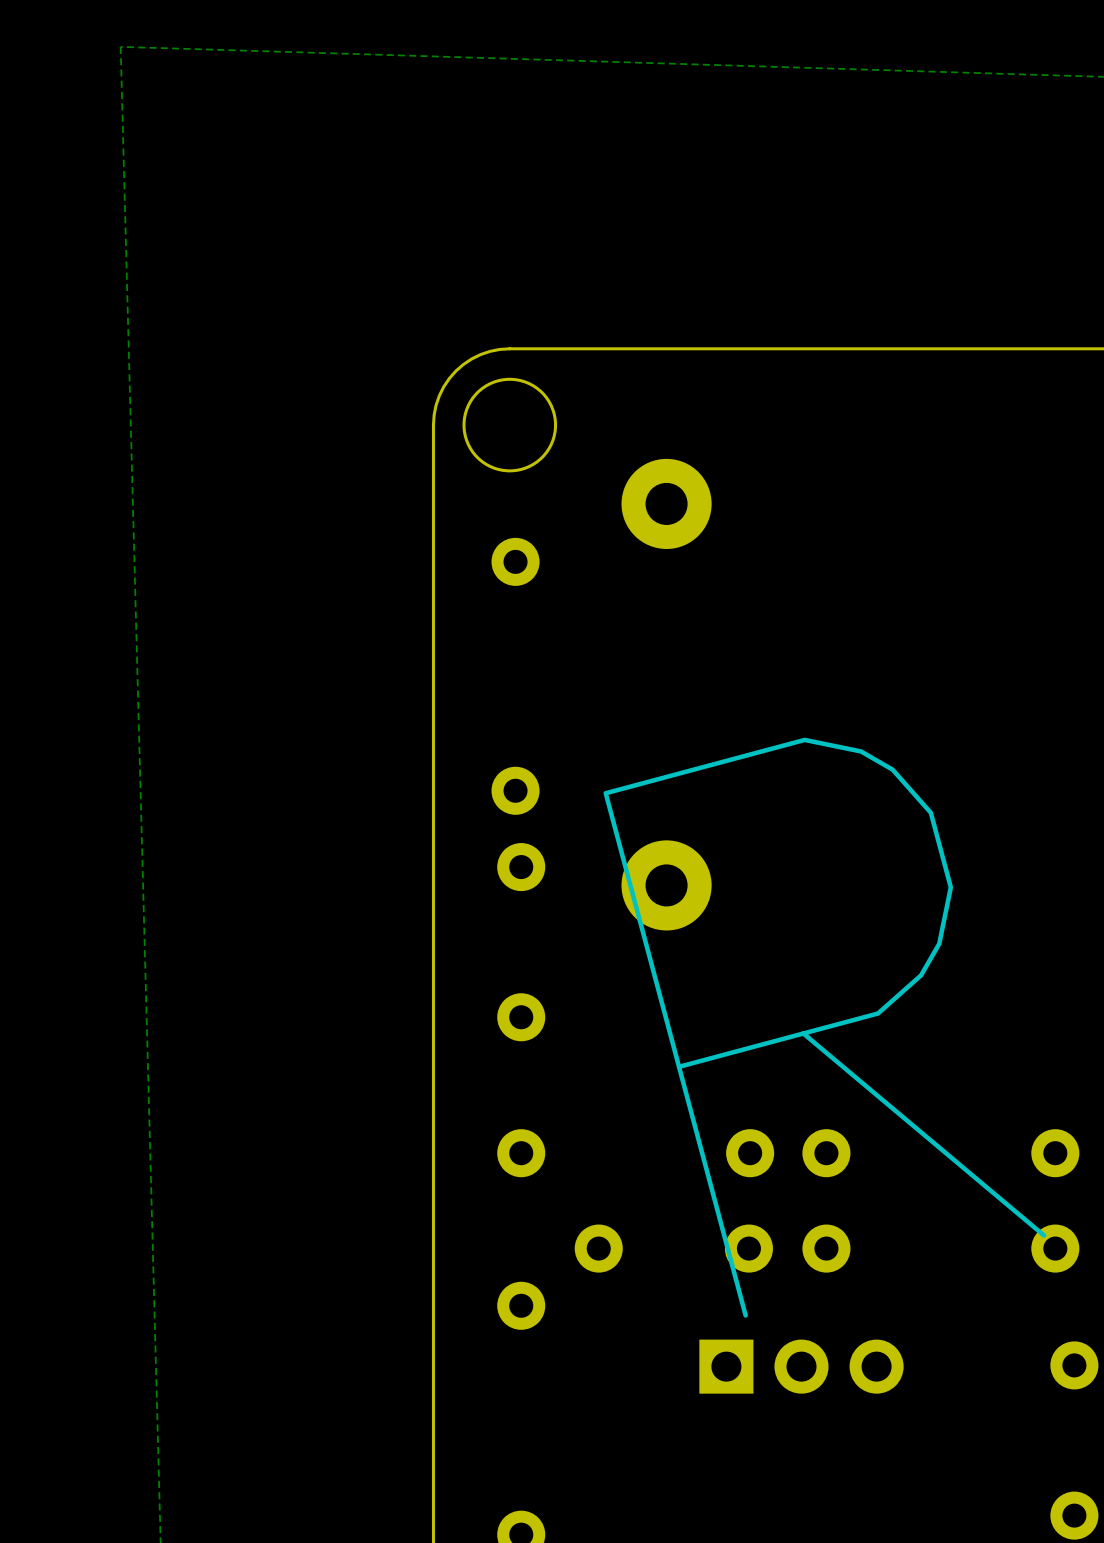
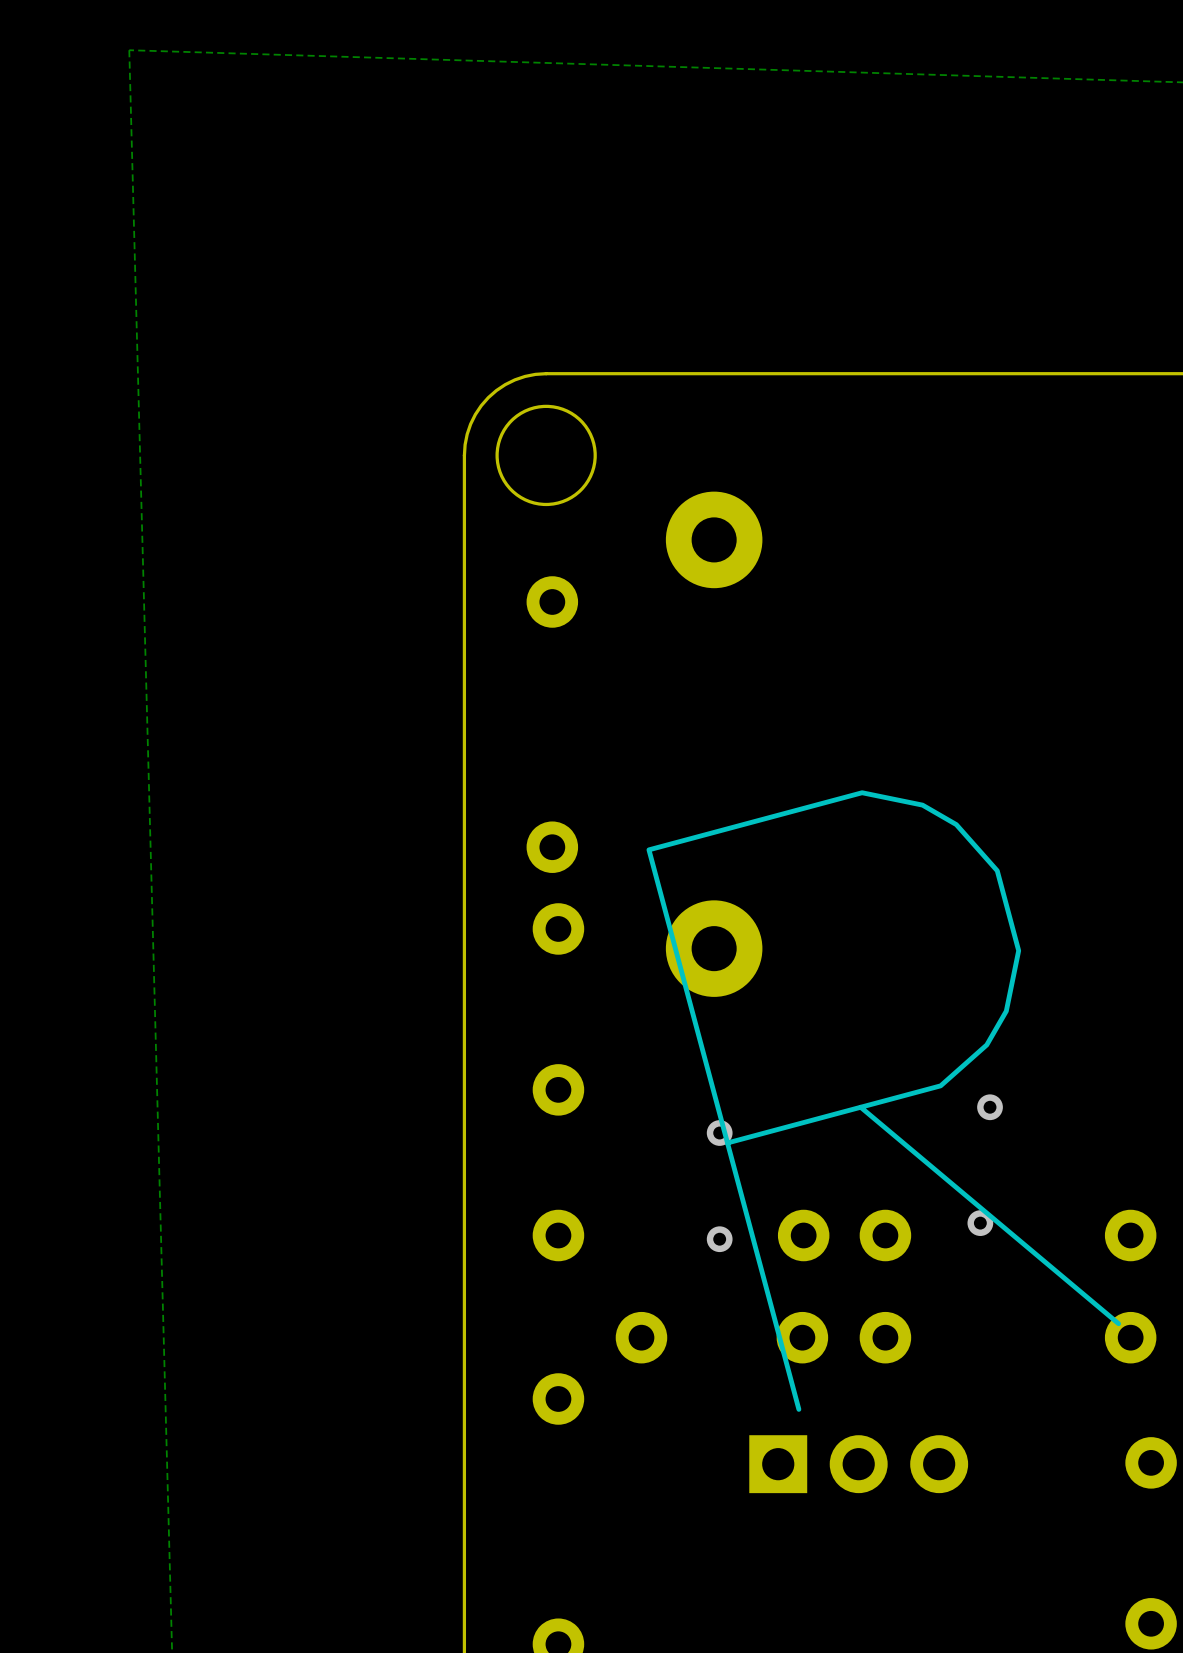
via: none -> (990, 1107)
via: none -> (719, 1133)
via: none -> (980, 1223)
via: none -> (719, 1239)

